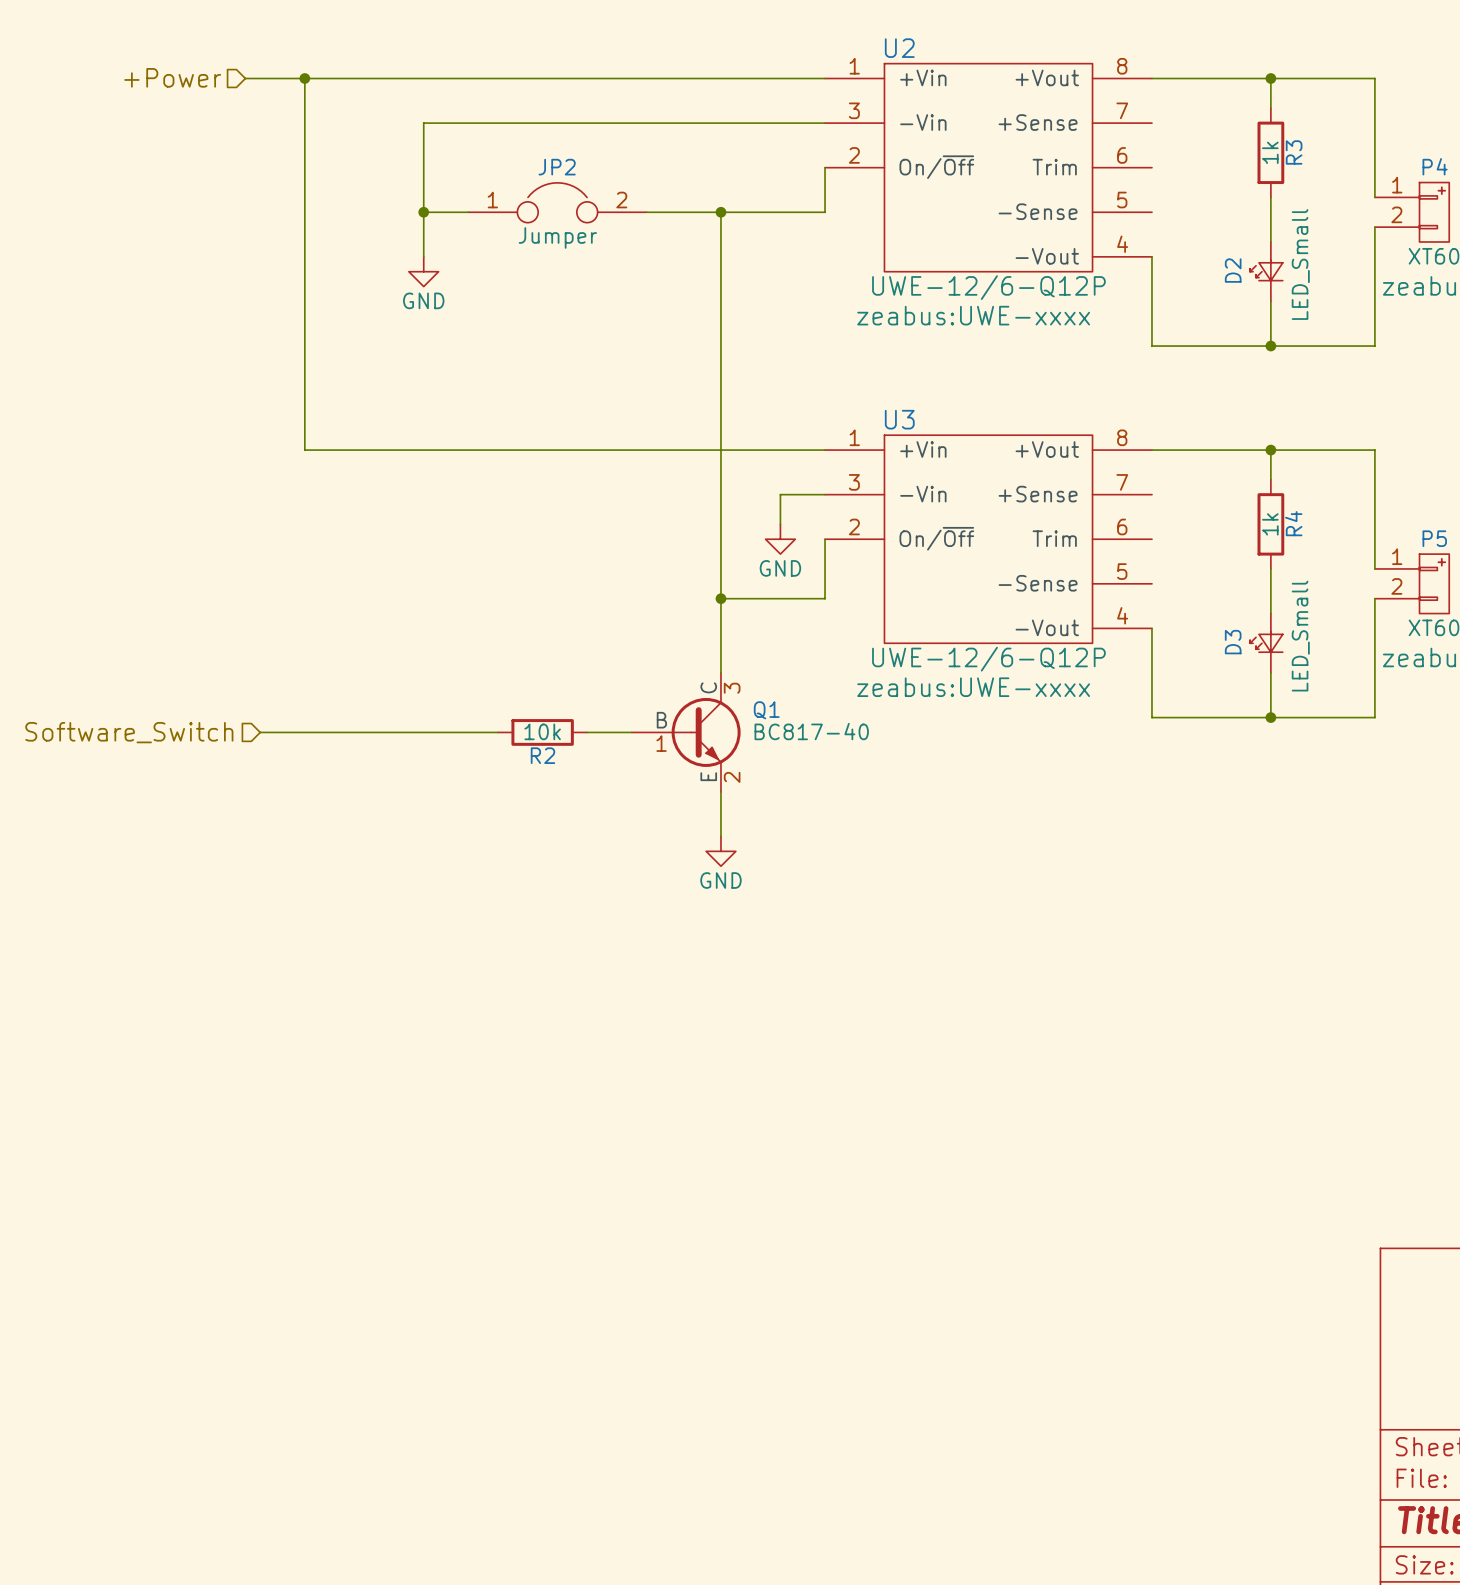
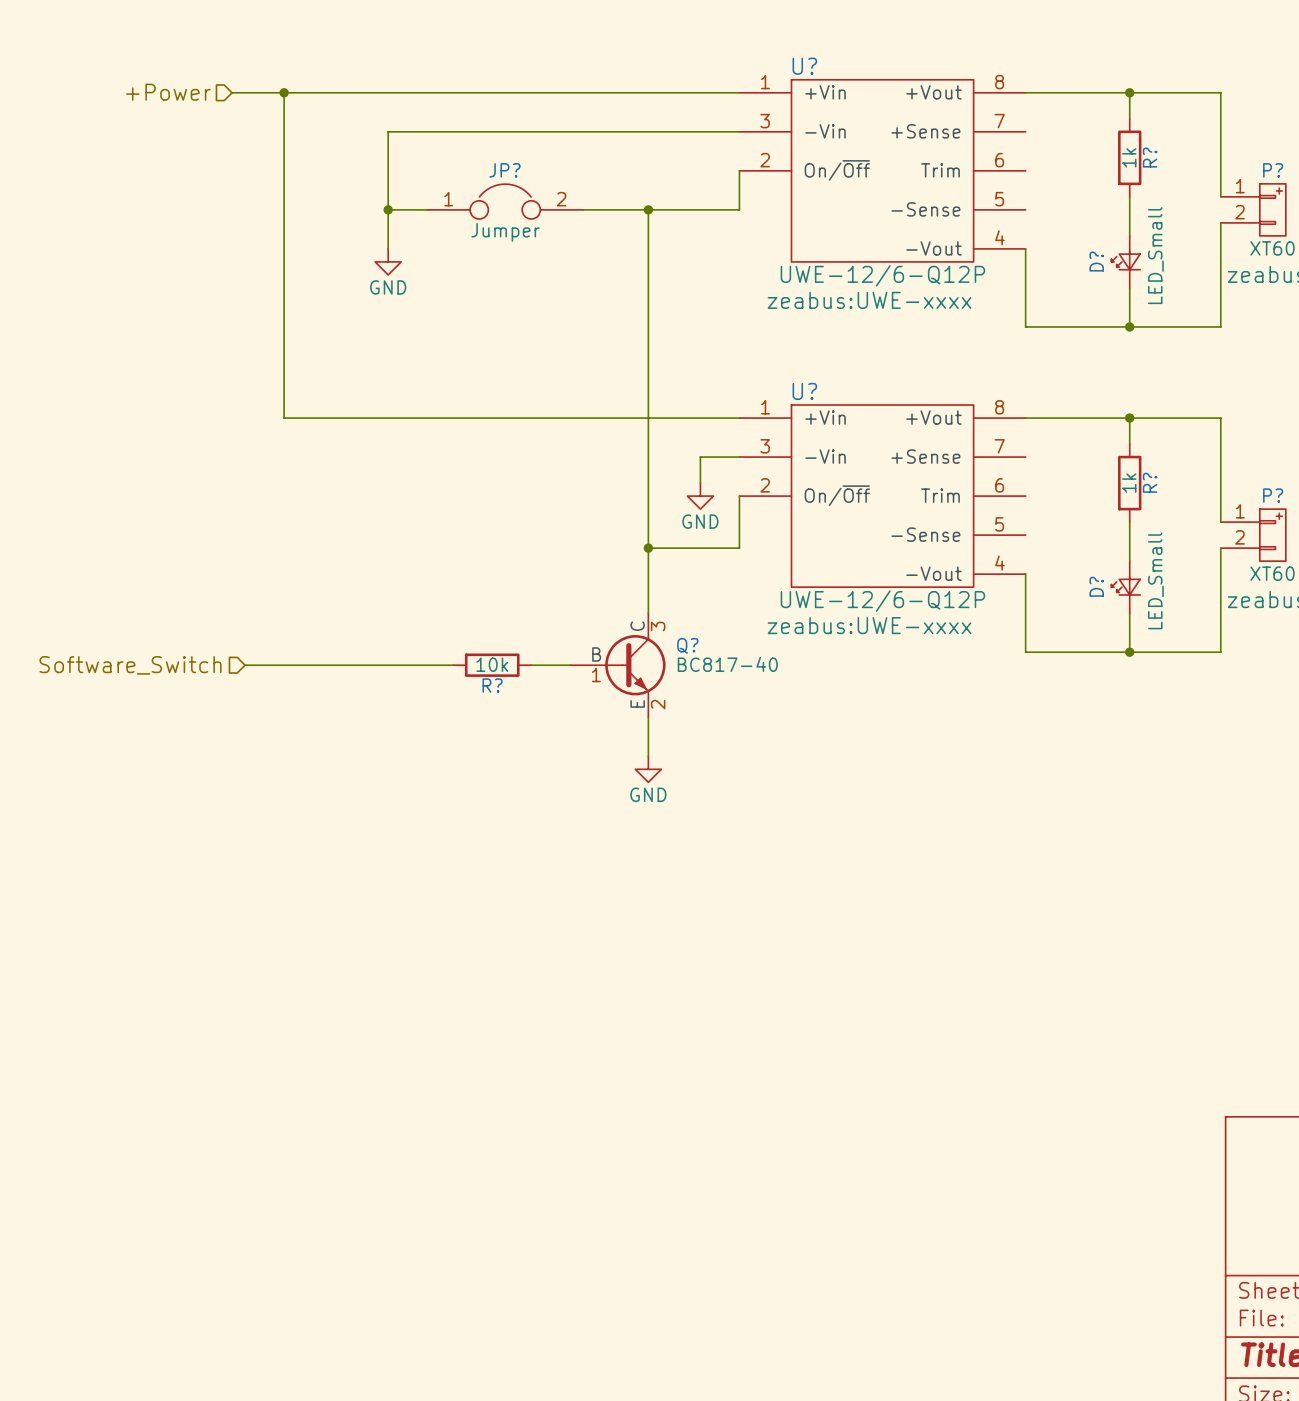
U2 name: U2 (899, 48) -> U? (804, 66)
R3 name: R3 (1294, 152) -> R? (1150, 157)
P4 name: P4 (1435, 166) -> P? (1273, 170)
JP2 name: JP2 (557, 167) -> JP? (504, 170)
D2 name: D2 (1233, 270) -> D? (1096, 261)
U3 name: U3 (899, 419) -> U? (804, 391)
R4 name: R4 (1293, 523) -> R? (1150, 482)
P5 name: P5 (1434, 538) -> P? (1273, 495)
D3 name: D3 (1233, 642) -> D? (1096, 586)
Q1 name: Q1 (766, 710) -> Q? (687, 645)
R2 name: R2 (542, 755) -> R? (492, 685)

